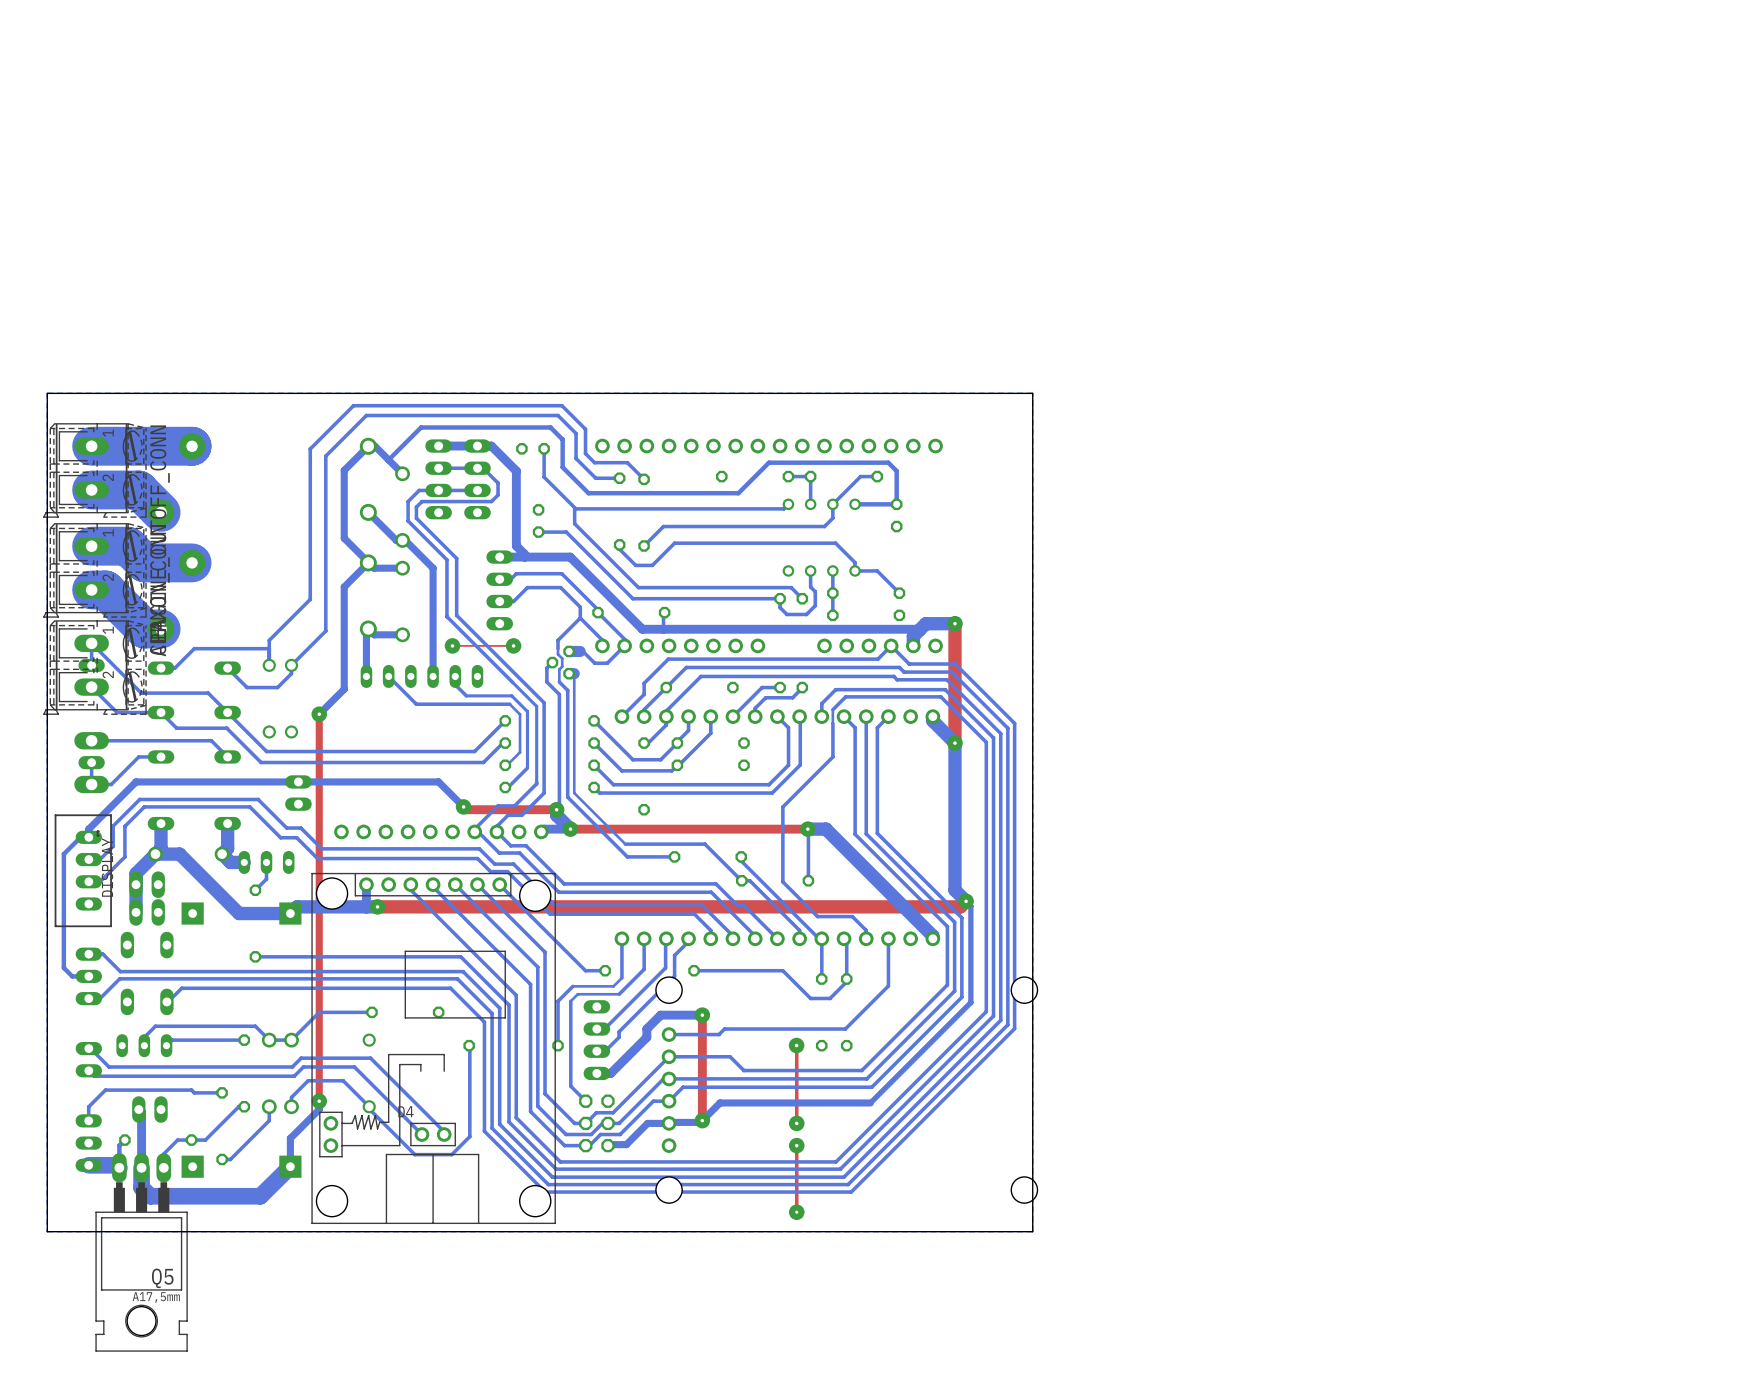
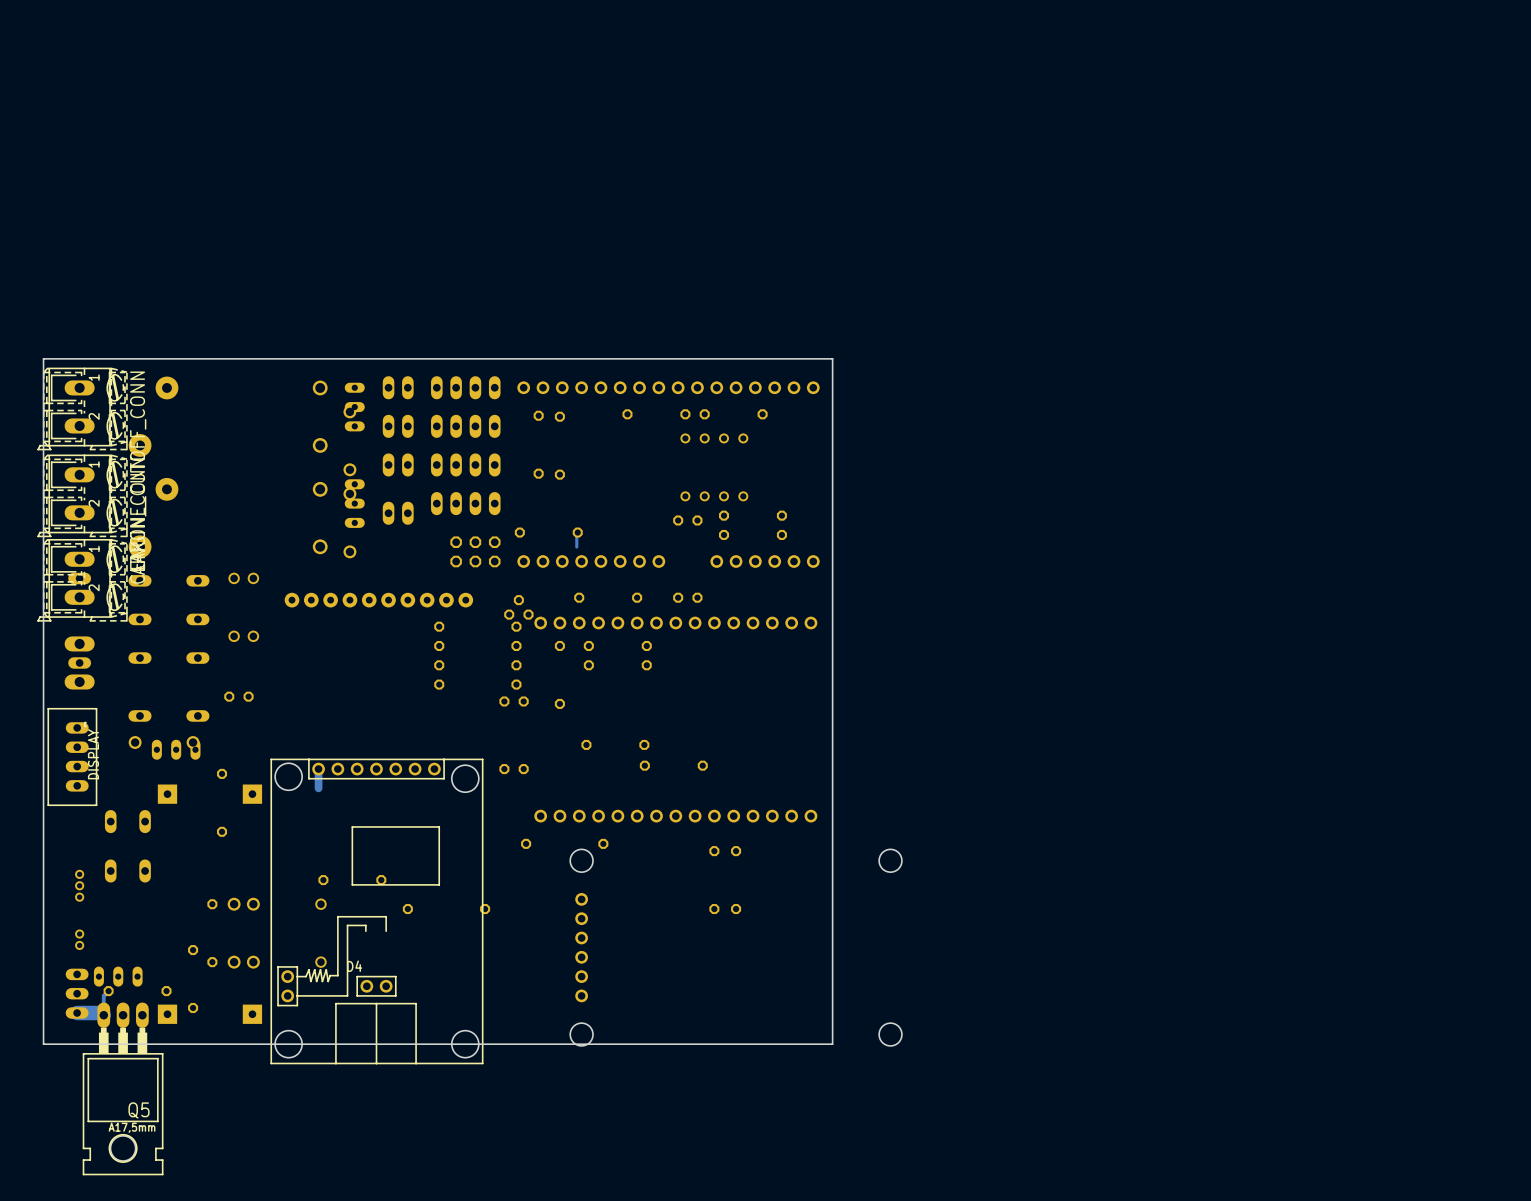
board edge: (1032, 393) (47, 393) (47, 1231) (1032, 1231) (1032, 393) -> (832, 358) (832, 1044) (43, 1044) (43, 358) (832, 358)
part footprint: [516, 443, 550, 455] -> [431, 376, 501, 400]
bottom track: (192, 446) (91, 446) -> none
bottom track: (438, 446) (491, 446) (516, 471) (516, 545) (524, 554) (524, 557) -> none
part: none -> (398, 387)
bottom track: (544, 448) (544, 477) (574, 507) (574, 523) (638, 587) (791, 587) (802, 598) -> none
bottom track: (388, 459) (421, 427) (550, 427) (562, 439) (562, 467) (588, 493) (738, 493) (768, 462) (888, 462) (896, 471) (896, 504) (855, 504) -> none
part: none -> (354, 407)
bottom track: (438, 468) (483, 468) (498, 483) (498, 495) (491, 501) (421, 501) (416, 507) (416, 518) (456, 558) (456, 615) (544, 702) (544, 793) (521, 815) (508, 815) (496, 826) (496, 831) (510, 845) (526, 845) (564, 883) (715, 883) (737, 905) (744, 905) (777, 938) -> none
bottom track: (402, 473) (374, 446) (368, 446) (344, 470) (344, 538) (374, 568) (402, 568) -> none
bottom track: (788, 476) (810, 476) (810, 504) -> none
bottom track: (877, 476) (860, 476) (832, 504) (832, 518) (824, 526) (663, 526) (644, 545) -> none
bottom track: (619, 478) (595, 478) (576, 458) (576, 433) (558, 415) (366, 415) (325, 456) (325, 631) (291, 665) (291, 673) (277, 687) (247, 687) (227, 668) -> none
part: (438, 479) -> none
part: (477, 479) -> none
bottom track: (644, 479) (627, 462) (594, 462) (585, 453) (585, 429) (562, 405) (353, 405) (310, 449) (310, 599) (269, 640) (269, 665) -> none
bottom track: (91, 490) (138, 490) (161, 512) -> none
part: none -> (398, 426)
bottom track: (477, 490) (419, 490) (408, 501) (408, 520) (446, 559) (446, 616) (536, 706) (536, 783) (514, 805) (497, 805) (474, 829) (474, 831) (478, 831) (499, 853) (519, 853) (558, 892) (711, 892) (755, 936) (755, 938) -> none
part: none -> (465, 426)
bottom track: (788, 504) (783, 508) (574, 508) -> none
bottom track: (368, 512) (396, 540) (405, 540) (433, 568) (433, 676) -> none
part: (896, 515) -> none
part: (538, 520) -> none
bottom track: (538, 532) (566, 532) (632, 598) (780, 598) (780, 607) (786, 614) (806, 614) (815, 605) (815, 591) (810, 587) (810, 570) -> none
part: none -> (398, 464)
part: none -> (465, 464)
bottom track: (619, 544) (619, 549) (635, 565) (652, 565) (674, 543) (835, 543) (855, 562) (855, 570) (877, 570) (899, 593) -> none
bottom track: (91, 546) (127, 546) (144, 562) (192, 562) -> none
bottom track: (499, 557) (570, 557) (642, 629) (919, 629) -> none
bottom track: (368, 562) (344, 587) (344, 689) (319, 714) -> none
bottom track: (832, 570) (832, 615) -> none
part: none -> (354, 503)
bottom track: (499, 579) (510, 579) (516, 573) (561, 573) (625, 640) (625, 644) (607, 663) (594, 663) (583, 651) (569, 651) -> none
part: none -> (465, 503)
bottom track: (91, 589) (105, 589) (144, 628) (161, 628) -> none
part: none -> (398, 513)
part: (499, 590) -> none
bottom track: (499, 601) (513, 601) (527, 587) (560, 587) (580, 607) (580, 618) -> none
bottom track: (580, 618) (558, 640) (558, 654) (562, 658) (562, 666) (559, 669) (559, 682) (567, 690) (567, 797) (627, 856) (674, 856) -> none
bottom track: (580, 618) (602, 640) (602, 645) -> none
bottom track: (954, 623) (925, 623) (913, 636) (913, 645) -> none
top track: (954, 623) (954, 743) -> none
via: (954, 623) -> none
bottom track: (402, 634) (374, 634) (368, 628) (366, 630) (366, 676) -> none
part: none -> (475, 551)
via: (452, 645) -> none
top track: (513, 645) (452, 645) -> none
via: (513, 645) -> none
bottom track: (269, 648) (194, 648) (174, 668) (161, 668) -> none
bottom track: (552, 662) (546, 668) (546, 682) (559, 694) (559, 806) (556, 809) (556, 815) (570, 829) (544, 829) (541, 831) -> none
part rotation: 0° (560, 662) -> 90° clockwise (518, 607)
part position: (560, 662) -> (518, 607)
bottom track: (91, 665) (91, 643) (141, 693) (208, 693) (266, 751) (474, 751) (505, 720) -> none
bottom track: (569, 673) (574, 673) (574, 793) (625, 844) (704, 844) (741, 880) (749, 880) (799, 930) (799, 938) -> none
bottom track: (388, 676) (416, 704) (509, 704) (520, 714) (520, 752) (505, 765) -> none
part: (388, 676) -> none
bottom track: (455, 676) (455, 684) (466, 695) (511, 695) (527, 711) (527, 768) (508, 787) (505, 787) -> none
part: (455, 676) -> none
bottom track: (91, 687) (117, 712) (161, 712) (176, 728) (226, 728) (261, 762) (483, 762) (502, 743) (505, 743) -> none
bottom track: (780, 687) (762, 687) (732, 716) -> none
bottom track: (802, 687) (792, 697) (765, 697) (755, 708) (755, 716) -> none
part: none -> (378, 600)
top track: (319, 714) (319, 1101) -> none
via: (319, 714) -> none
bottom track: (621, 716) (644, 694) (644, 683) (668, 659) (877, 659) (891, 645) (909, 664) (955, 664) (1014, 723) (1014, 1028) (851, 1192) (545, 1192) (484, 1131) (484, 1022) (450, 988) (181, 988) (166, 1001) -> none
bottom track: (644, 716) (644, 709) (686, 667) (899, 667) (904, 672) (951, 672) (1007, 728) (1007, 1024) (848, 1184) (548, 1184) (492, 1128) (492, 1013) (457, 978) (119, 978) (99, 998) (88, 998) -> none
bottom track: (688, 716) (688, 730) (660, 759) (632, 759) (594, 720) -> none
bottom track: (710, 716) (710, 733) (671, 770) (621, 770) (594, 743) -> none
bottom track: (777, 716) (788, 727) (788, 765) (768, 784) (613, 784) (594, 765) -> none
bottom track: (799, 716) (800, 765) (772, 793) (599, 793) (594, 787) -> none
bottom track: (821, 716) (821, 703) (835, 689) (945, 689) (993, 737) (993, 1016) (840, 1169) (556, 1169) (509, 1122) (509, 1005) (460, 956) (255, 956) -> none
bottom track: (844, 716) (855, 727) (855, 834) (947, 926) (947, 984) (861, 1070) (743, 1070) (730, 1056) (669, 1056) -> none
bottom track: (866, 716) (866, 833) (954, 922) (954, 991) (866, 1078) (669, 1078) -> none
bottom track: (888, 716) (877, 727) (877, 833) (961, 917) (961, 997) (871, 1087) (683, 1087) (669, 1101) (653, 1101) (620, 1134) (600, 1134) (589, 1145) (564, 1145) (530, 1111) (530, 984) (433, 886) (433, 884) -> none
bottom track: (932, 716) (932, 720) (954, 743) (954, 890) (970, 906) (970, 1002) (870, 1102) (720, 1102) (700, 1122) (647, 1123) (626, 1144) (607, 1145) -> none
bottom track: (832, 723) (832, 709) (845, 696) (940, 696) (986, 742) (986, 1011) (836, 1161) (560, 1161) (516, 1117) (516, 995) (410, 889) (410, 884) -> none
bottom track: (832, 723) (832, 756) (782, 807) (782, 881) (817, 916) (852, 916) (866, 930) (866, 938) -> none
bottom track: (91, 740) (211, 740) (227, 756) -> none
bottom track: (644, 743) (648, 743) (666, 724) (666, 711) (701, 676) (893, 676) (897, 679) (946, 679) (1000, 733) (1000, 1020) (843, 1177) (552, 1177) (499, 1124) (499, 1008) (463, 971) (120, 971) (103, 954) (88, 954) -> none
via: (954, 743) -> none
bottom track: (161, 756) (138, 756) (111, 784) (91, 784) (91, 762) -> none
part: (298, 793) -> none
part: none -> (238, 696)
bottom track: (463, 806) (438, 781) (136, 781) (88, 829) (88, 837) (80, 837) (63, 854) (63, 967) (72, 976) (88, 976) -> none
top track: (463, 806) (466, 809) (556, 809) -> none
via: (463, 806) -> none
part: none -> (514, 701)
via: (556, 809) -> none
bottom track: (161, 823) (161, 848) (136, 873) (136, 912) -> none
bottom track: (227, 823) (227, 848) (222, 854) (230, 862) (244, 862) -> none
via: (570, 829) -> none
top track: (807, 829) (570, 829) -> none
via: (807, 829) -> none
part: (441, 831) -> none
bottom track: (155, 854) (179, 854) (239, 913) (290, 913) (297, 906) (377, 906) -> none
bottom track: (741, 856) (741, 860) (819, 938) (821, 938) (821, 978) -> none
bottom track: (88, 859) (99, 859) (113, 846) (113, 826) (139, 799) (258, 799) (286, 828) (300, 828) (321, 848) (479, 848) (494, 864) (513, 864) (554, 904) (701, 904) (732, 936) (732, 938) -> none
bottom track: (266, 862) (266, 879) (255, 890) -> none
part position: (266, 862) -> (176, 749)
bottom track: (808, 880) (807, 829) (826, 829) (932, 936) (932, 938) -> none
bottom track: (88, 881) (100, 881) (124, 856) (124, 826) (144, 806) (249, 806) (280, 837) (296, 837) (317, 858) (477, 858) (490, 871) (507, 871) (550, 914) (694, 914) (710, 930) (710, 938) -> none
part: (147, 884) -> none
bottom track: (455, 884) (537, 967) (537, 1106) (566, 1134) (591, 1134) (602, 1123) (619, 1123) (663, 1078) (669, 1078) -> none
bottom track: (477, 884) (545, 952) (545, 1093) (574, 1123) (585, 1123) (596, 1112) (613, 1112) (669, 1056) -> none
bottom track: (499, 884) (585, 970) (605, 970) -> none
part: none -> (514, 769)
top track: (966, 901) (960, 906) (377, 906) -> none
via: (966, 901) -> none
via: (377, 906) -> none
part: (147, 912) -> none
bottom track: (621, 938) (621, 977) (613, 986) (572, 986) (558, 1001) (558, 1045) -> none
bottom track: (644, 938) (644, 969) (619, 994) (577, 994) (570, 1001) (570, 1086) (585, 1101) -> none
bottom track: (666, 938) (665, 967) (604, 1029) (596, 1029) -> none
bottom track: (688, 938) (688, 941) (674, 955) (674, 976) (619, 1031) (619, 1037) (605, 1051) (596, 1051) -> none
bottom track: (844, 938) (846, 941) (846, 981) (830, 998) (810, 998) (782, 970) (694, 970) -> none
bottom track: (888, 938) (888, 985) (845, 1029) (724, 1029) (719, 1034) (669, 1034) -> none
part: (88, 976) -> none
bottom track: (372, 1012) (319, 1012) (291, 1040) (269, 1040) (255, 1026) (155, 1026) (144, 1037) (144, 1045) -> none
bottom track: (702, 1015) (660, 1015) (646, 1029) (646, 1037) (610, 1073) (596, 1073) -> none
top track: (702, 1015) (702, 1120) -> none
via: (702, 1015) -> none
part: none -> (79, 885)
bottom track: (244, 1040) (172, 1040) (166, 1045) -> none
part: (596, 1040) -> none
part position: (144, 1045) -> (118, 976)
bottom track: (469, 1045) (469, 1136) (451, 1154) (414, 1154) (343, 1080) (308, 1080) (291, 1097) (291, 1106) -> none
top track: (796, 1045) (796, 1123) -> none
via: (796, 1045) -> none
bottom track: (88, 1048) (109, 1067) (292, 1067) (301, 1058) (370, 1058) (444, 1131) (444, 1134) -> none
part: (88, 1059) -> none
bottom track: (88, 1070) (94, 1076) (294, 1076) (303, 1067) (354, 1067) (421, 1134) -> none
part: none -> (79, 939)
bottom track: (222, 1092) (194, 1092) (191, 1090) (105, 1090) (88, 1106) (88, 1120) -> none
bottom track: (319, 1101) (319, 1109) (290, 1138) (290, 1166) (260, 1196) (150, 1196) (141, 1187) (141, 1112) (138, 1109) -> none
via: (319, 1101) -> none
bottom track: (244, 1106) (238, 1106) (205, 1140) (177, 1140) (163, 1153) (163, 1167) -> none
bottom track: (269, 1106) (269, 1120) (230, 1159) (222, 1159) -> none
part: (149, 1109) -> none
via: (702, 1120) -> none
part: (596, 1123) -> none
via: (796, 1123) -> none
top track: (796, 1145) (796, 1212) -> none
via: (796, 1145) -> none
via: (796, 1212) -> none

